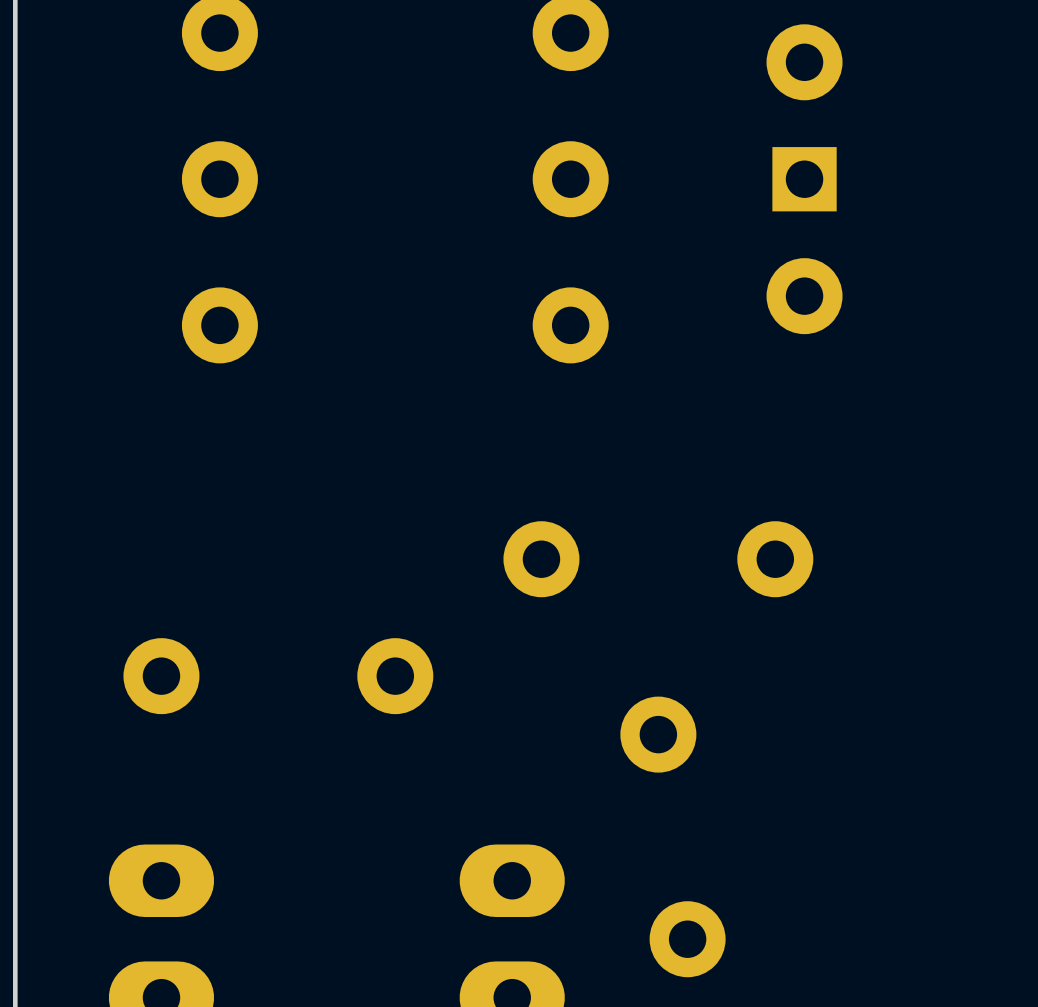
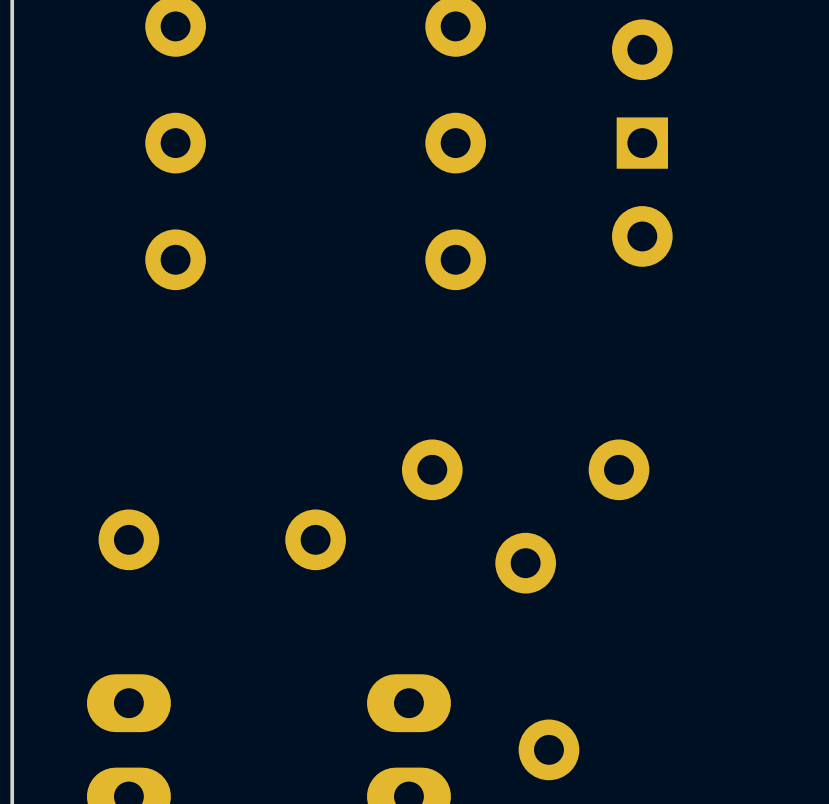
part footprint: [503, 521, 814, 773] -> [401, 439, 650, 594]

